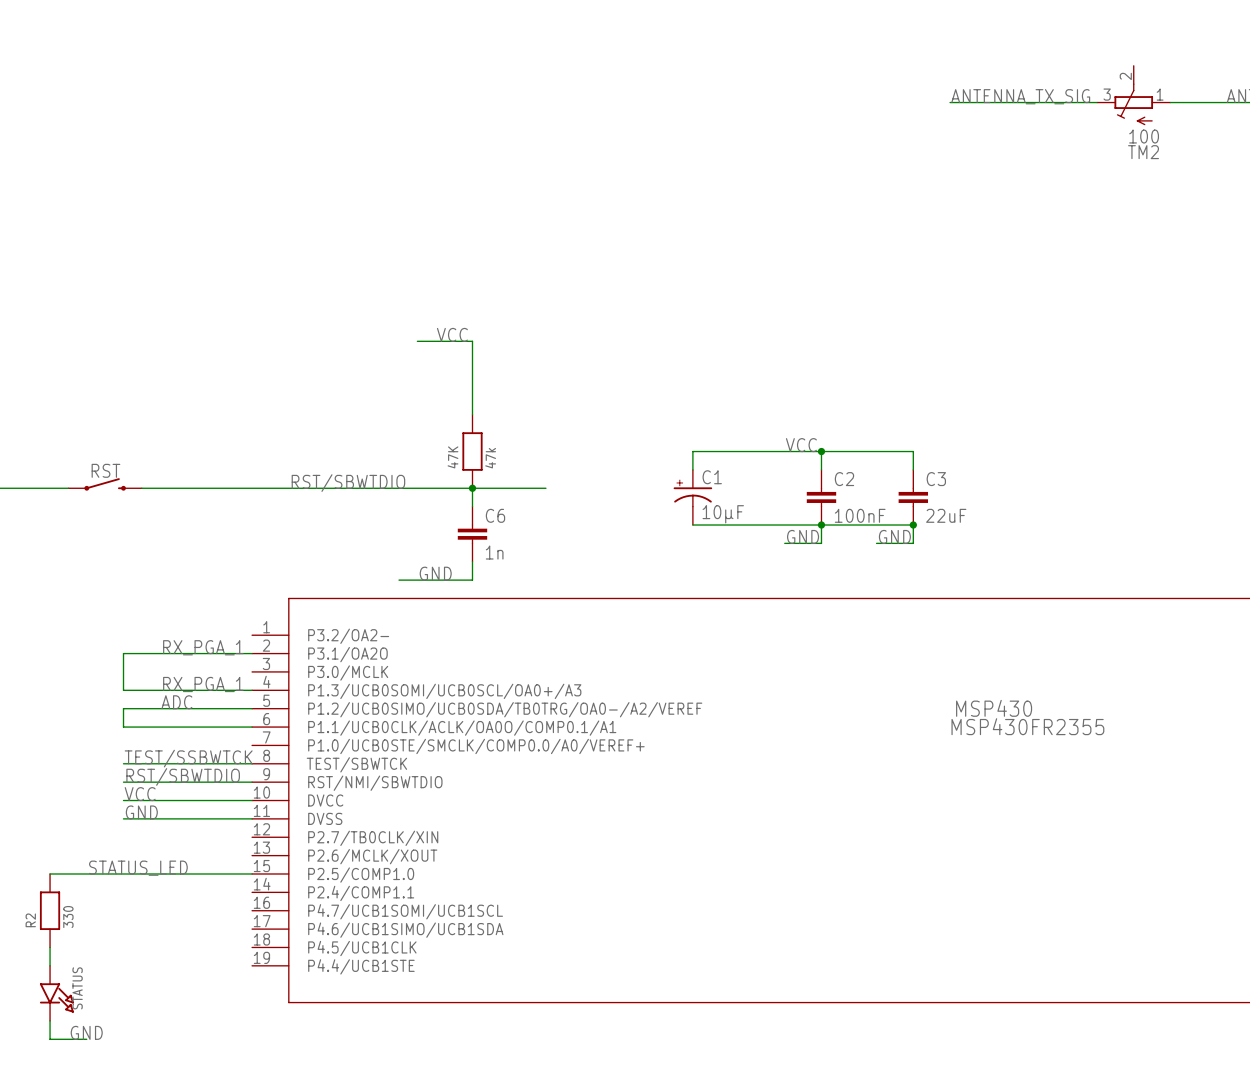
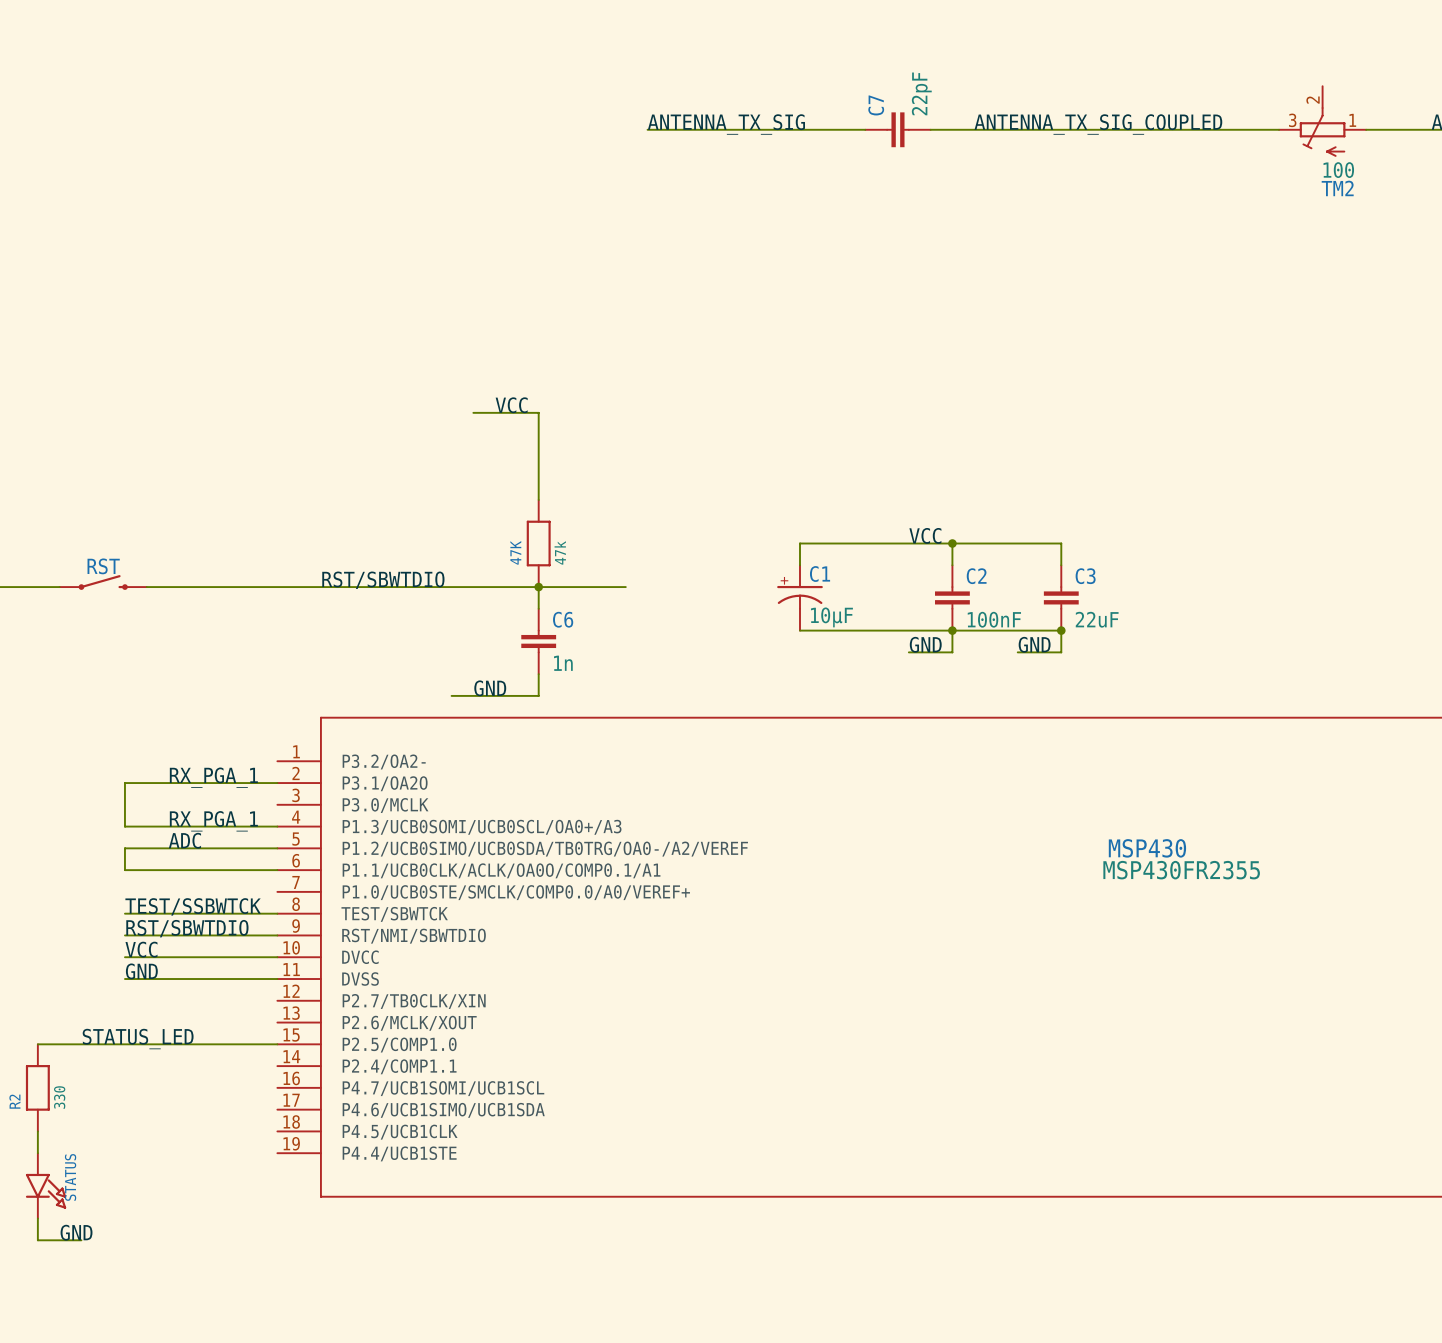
label: none -> ANTENNA_TX_SIG (726, 124)
label: ANTENNA_TX_SIG (1020, 96) -> ANTENNA_TX_SIG_COUPLED (1098, 124)
wire: none -> (647, 129) (865, 129)
C7: none -> 22pF (897, 129)
wire: none -> (930, 129) (1104, 129)

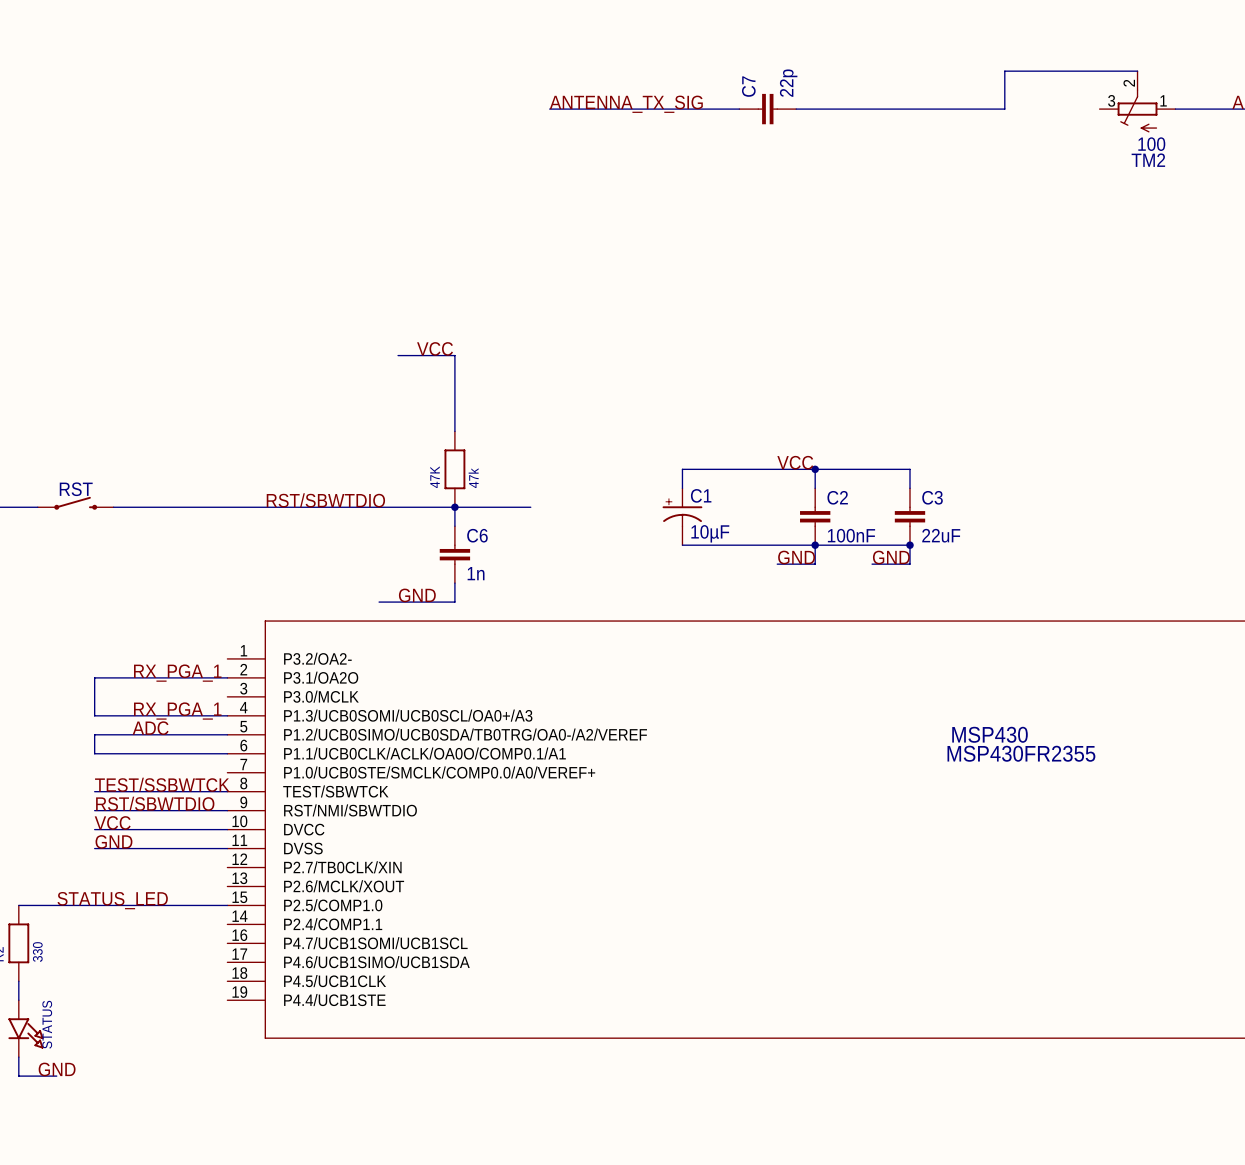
C7 value: 22pF (921, 93) -> 22p (788, 83)
label: ANTENNA_TX_SIG_COUPLED (1098, 124) -> none
wire: (1170, 129) (1279, 129) -> (1004, 109) (1004, 71) (1137, 71)

